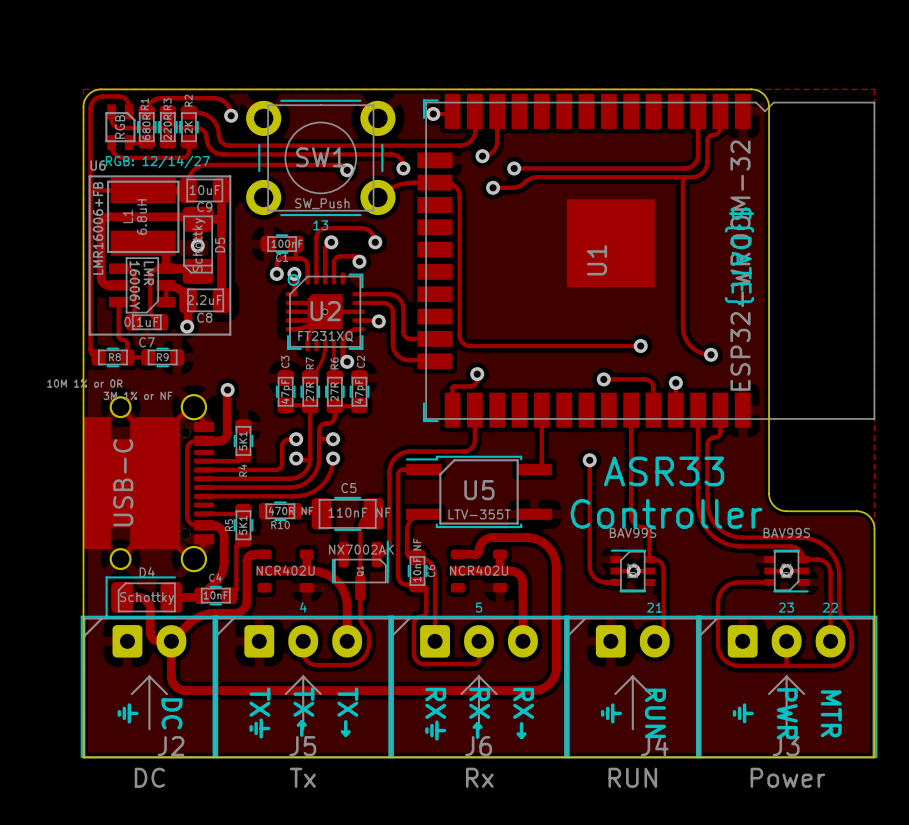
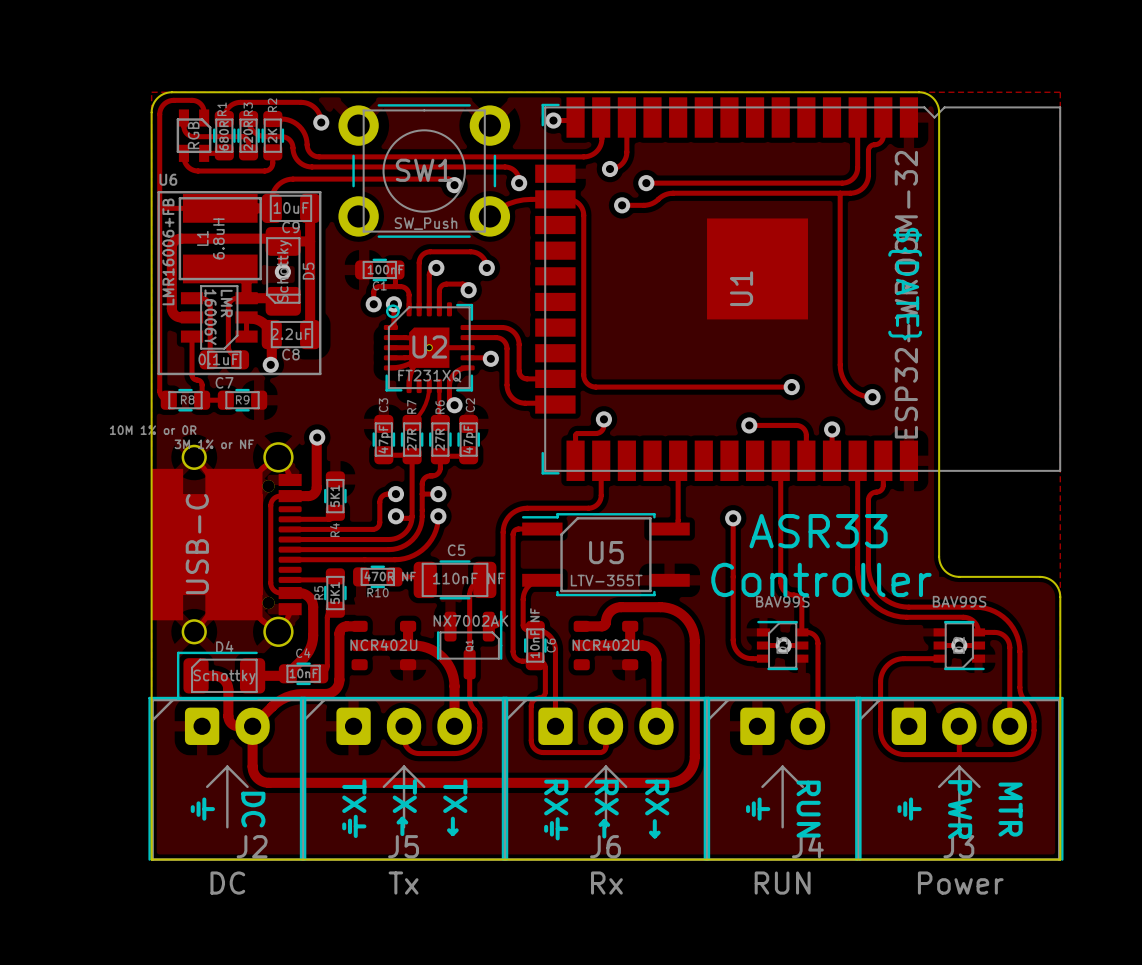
text: RGB: 12/14/27 (157, 161) -> none
text: 13 (320, 225) -> none
text: 4 (303, 607) -> none
text: 5 (479, 607) -> none
text: 21 (654, 607) -> none
text: 23 (786, 607) -> none
text: 22 (830, 607) -> none

